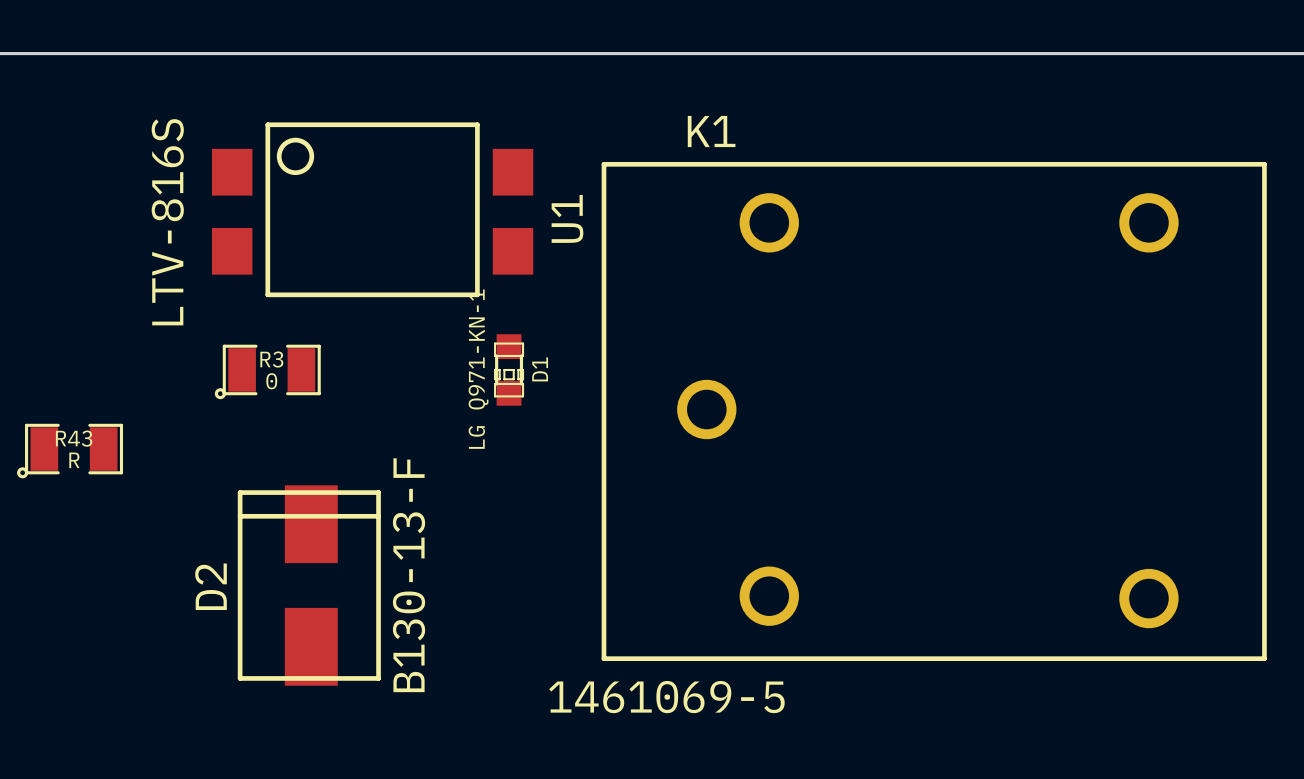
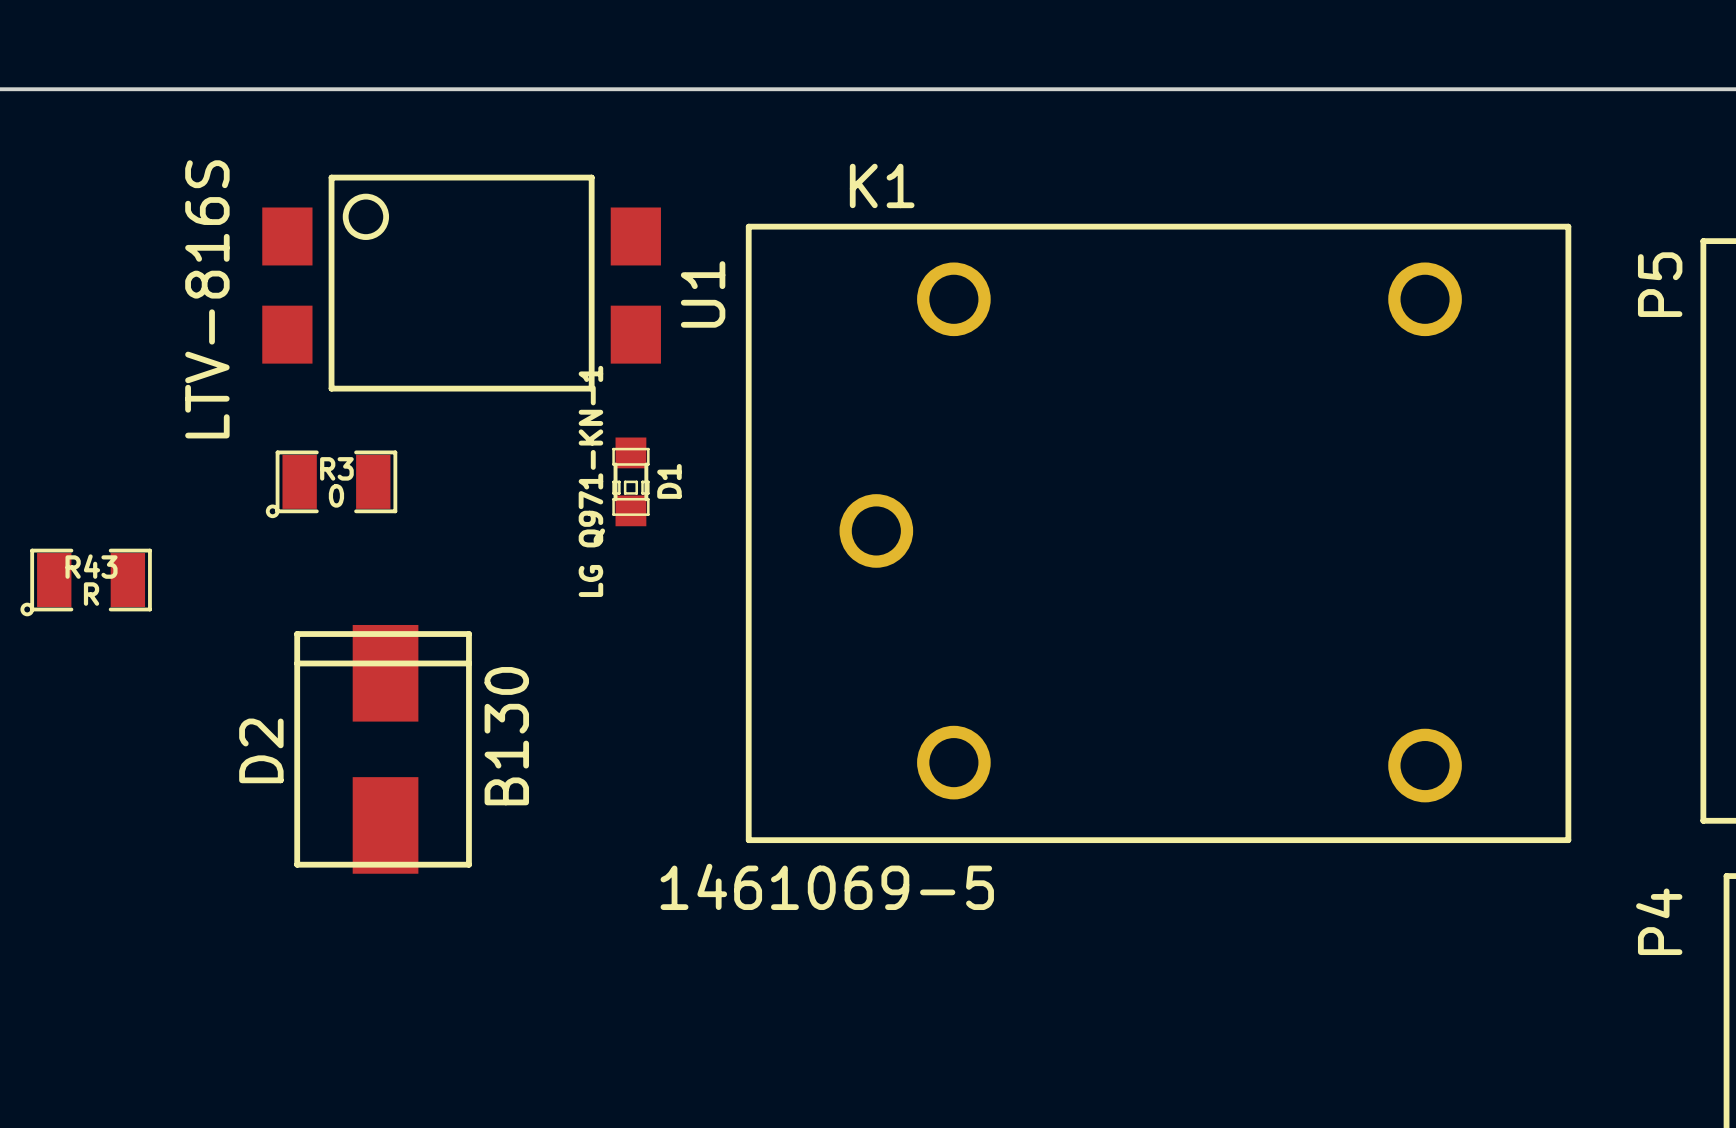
D2 value: B130-13-F (409, 575) -> B130 (506, 736)

